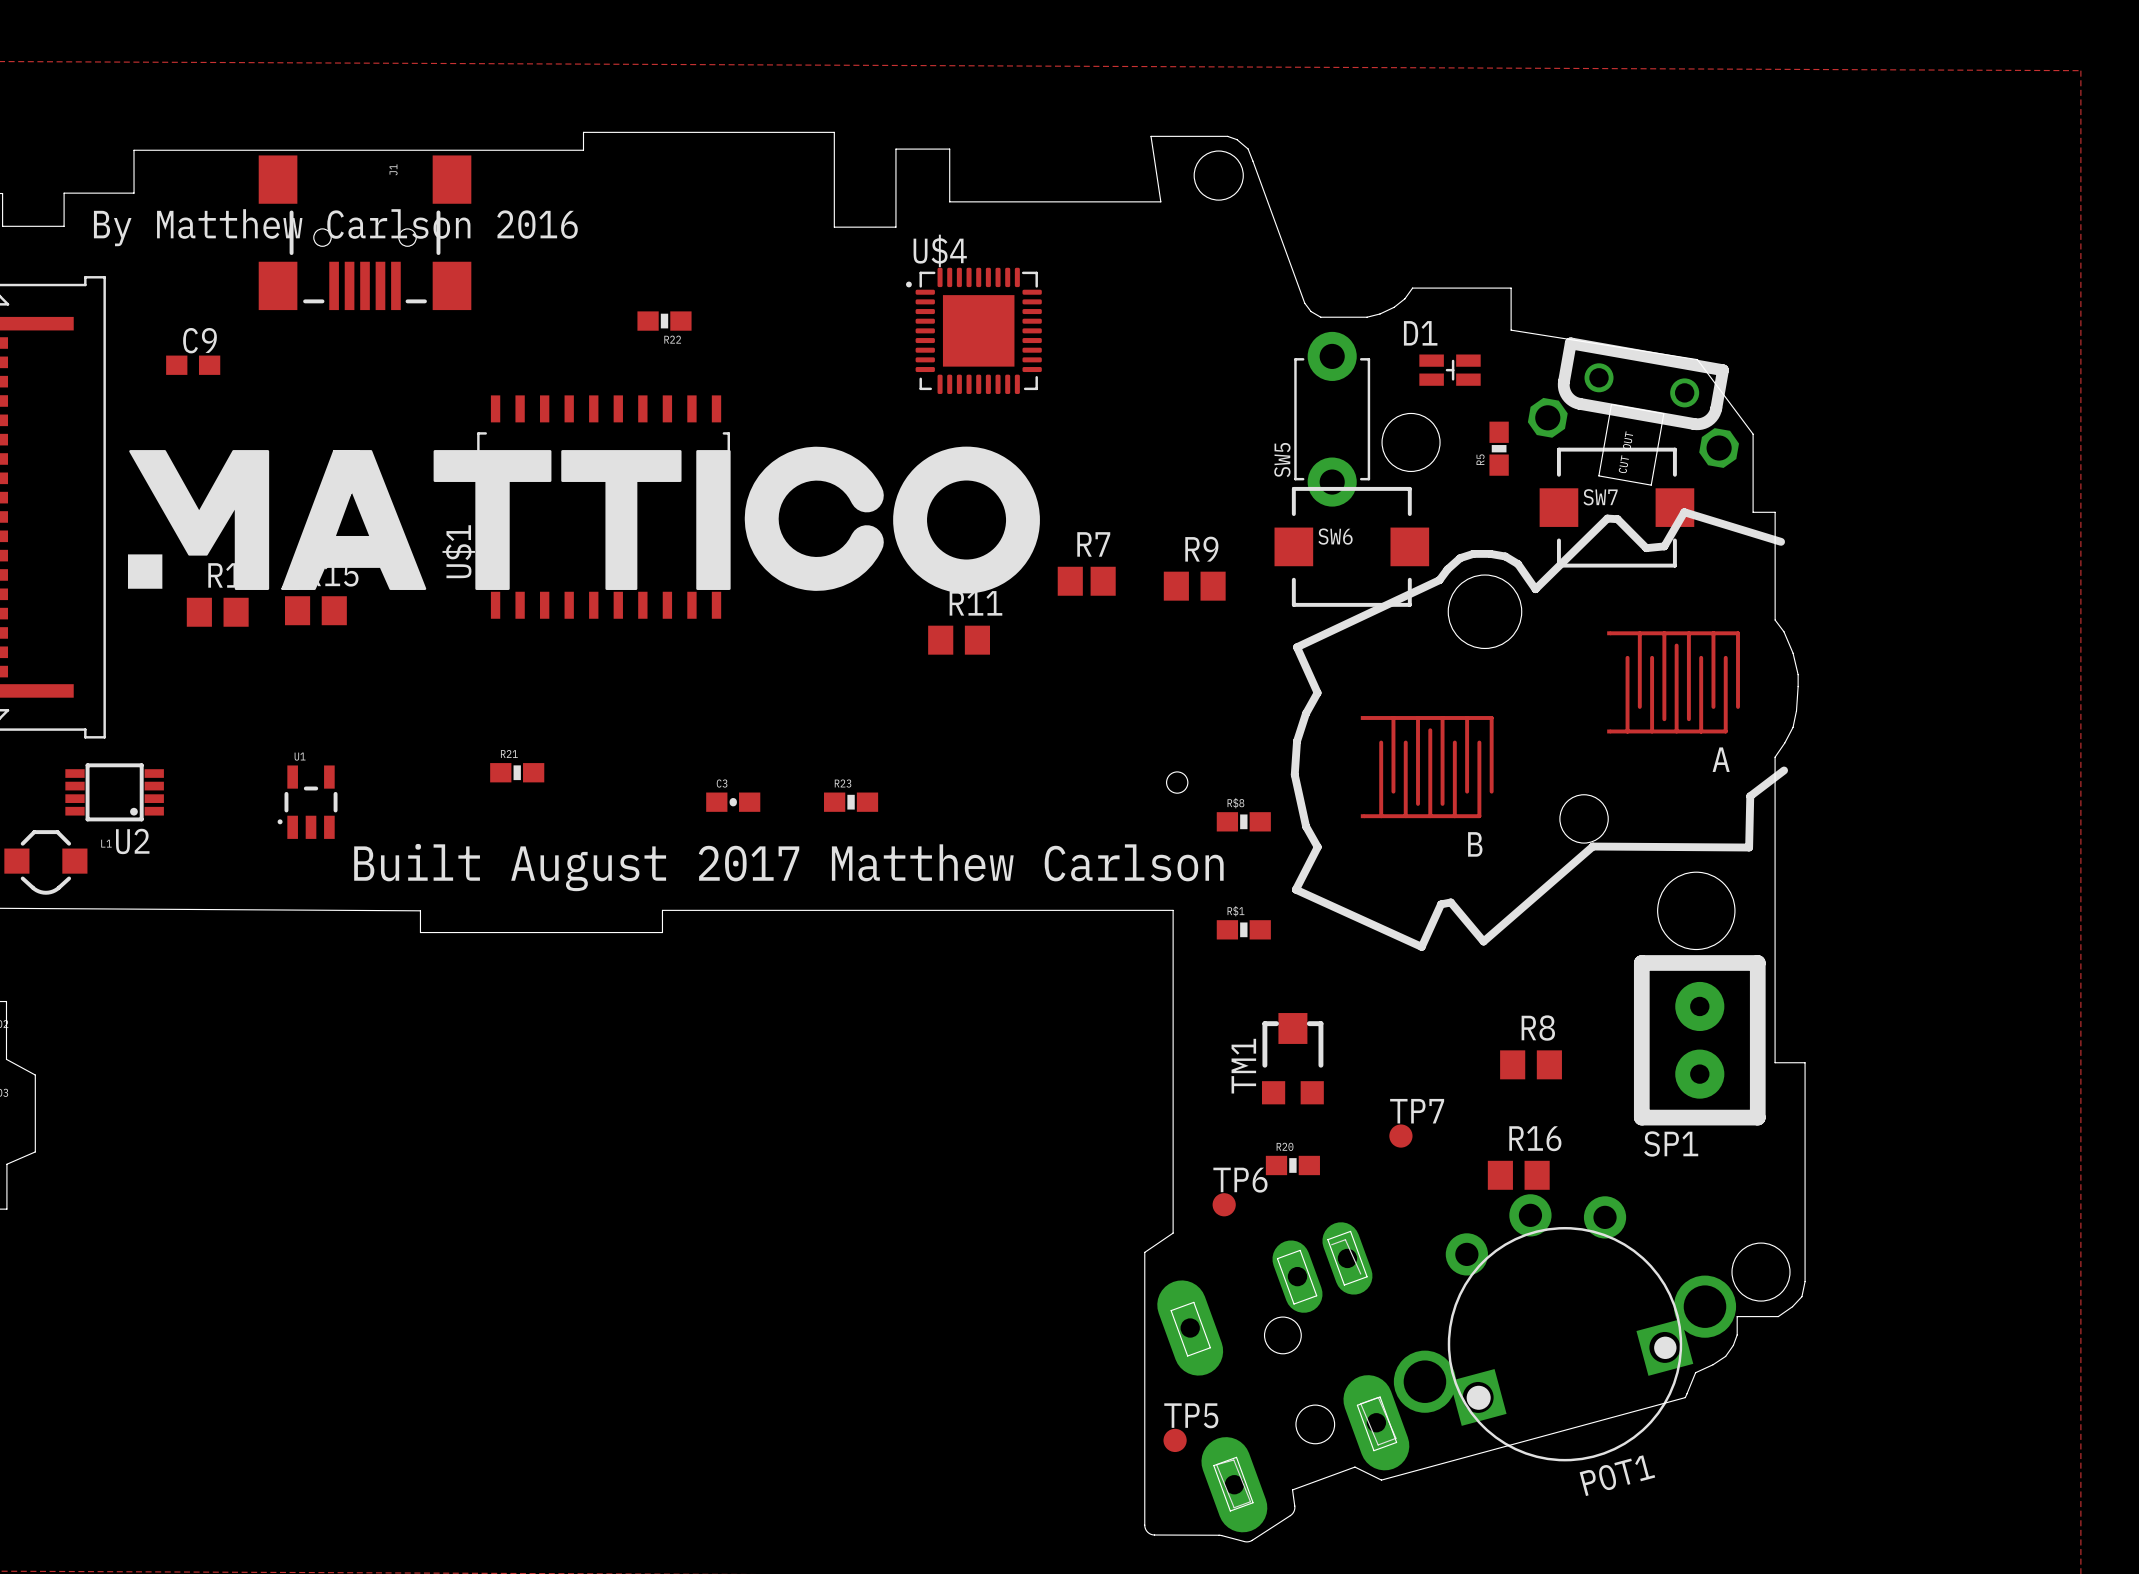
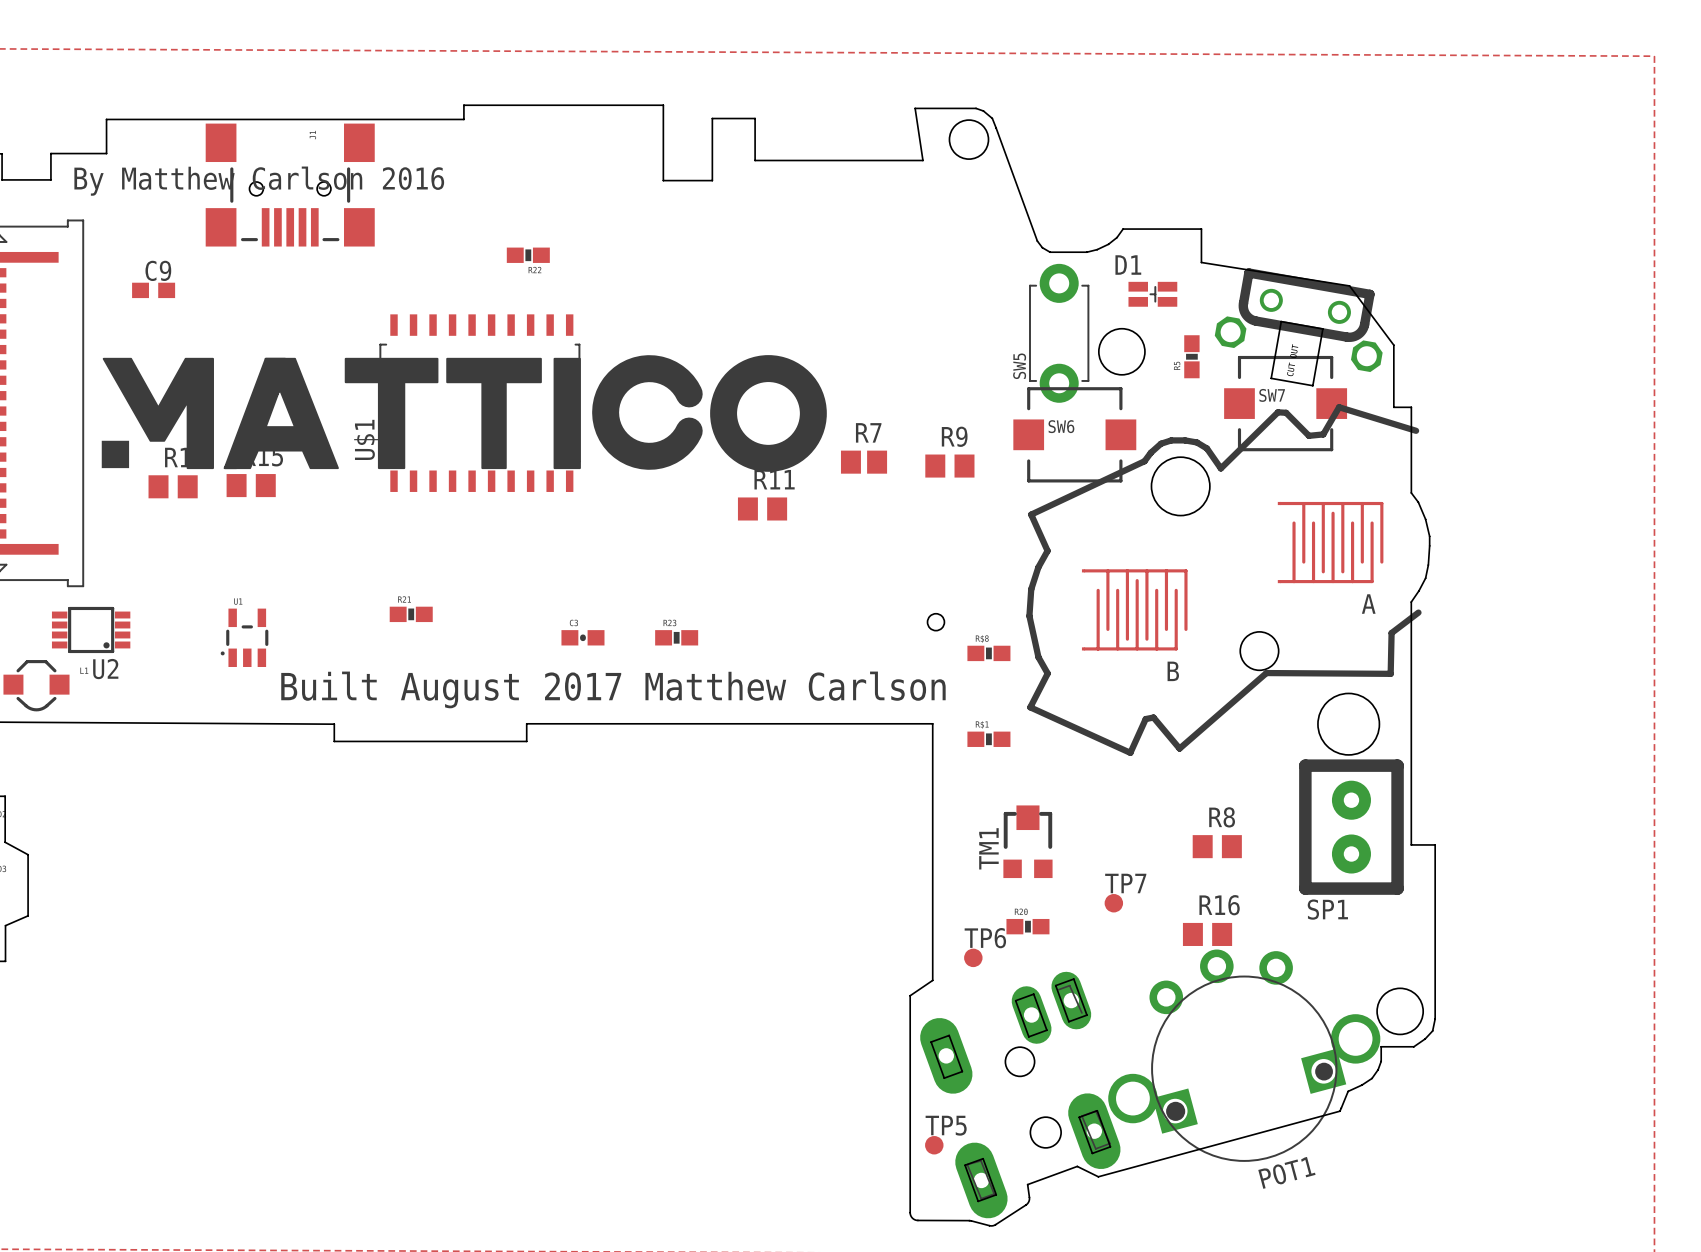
U$4: (973, 330) -> none

